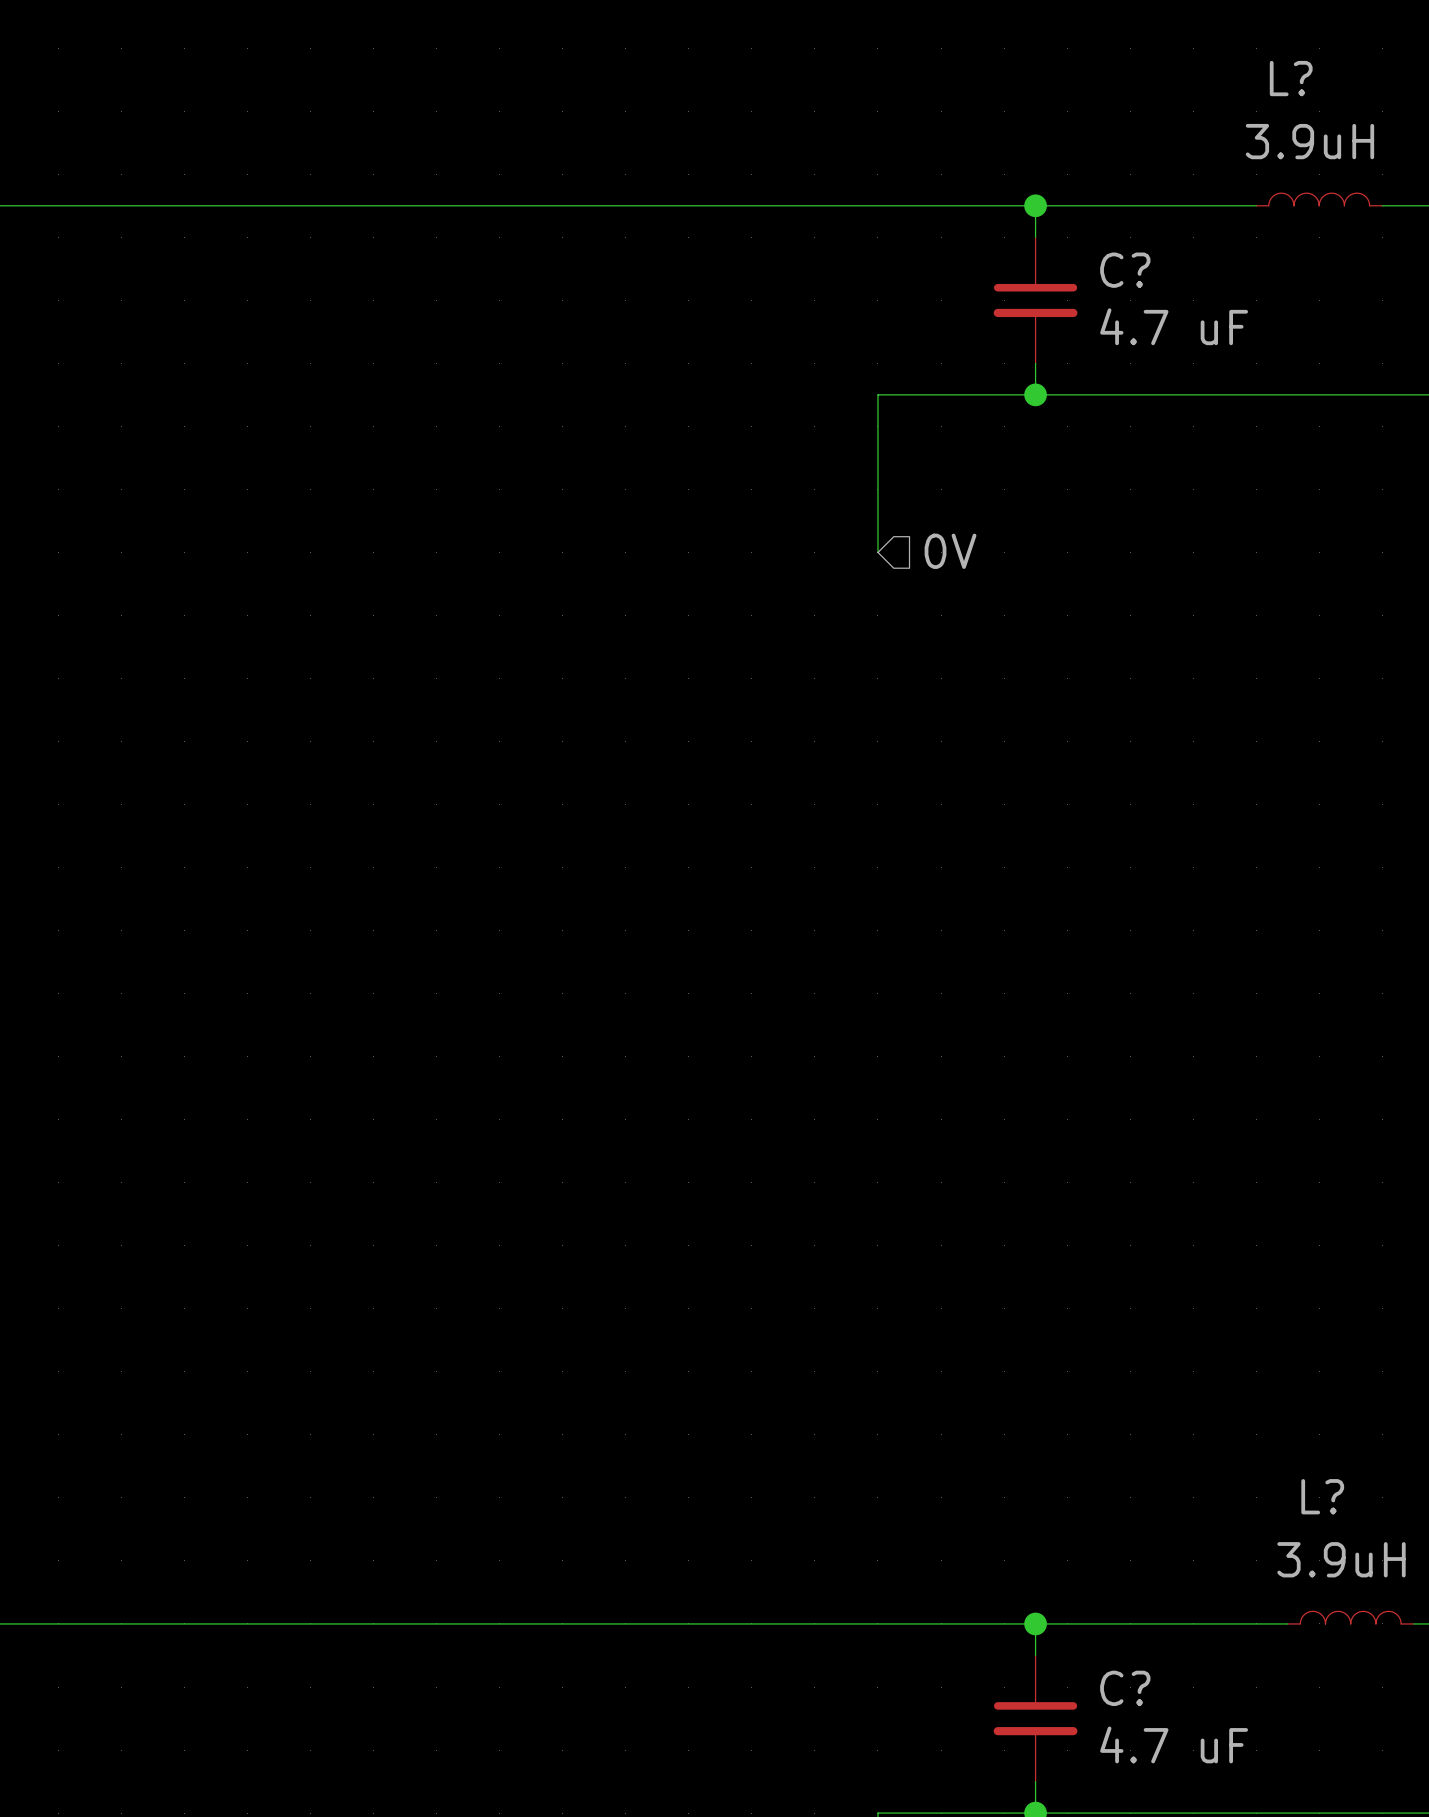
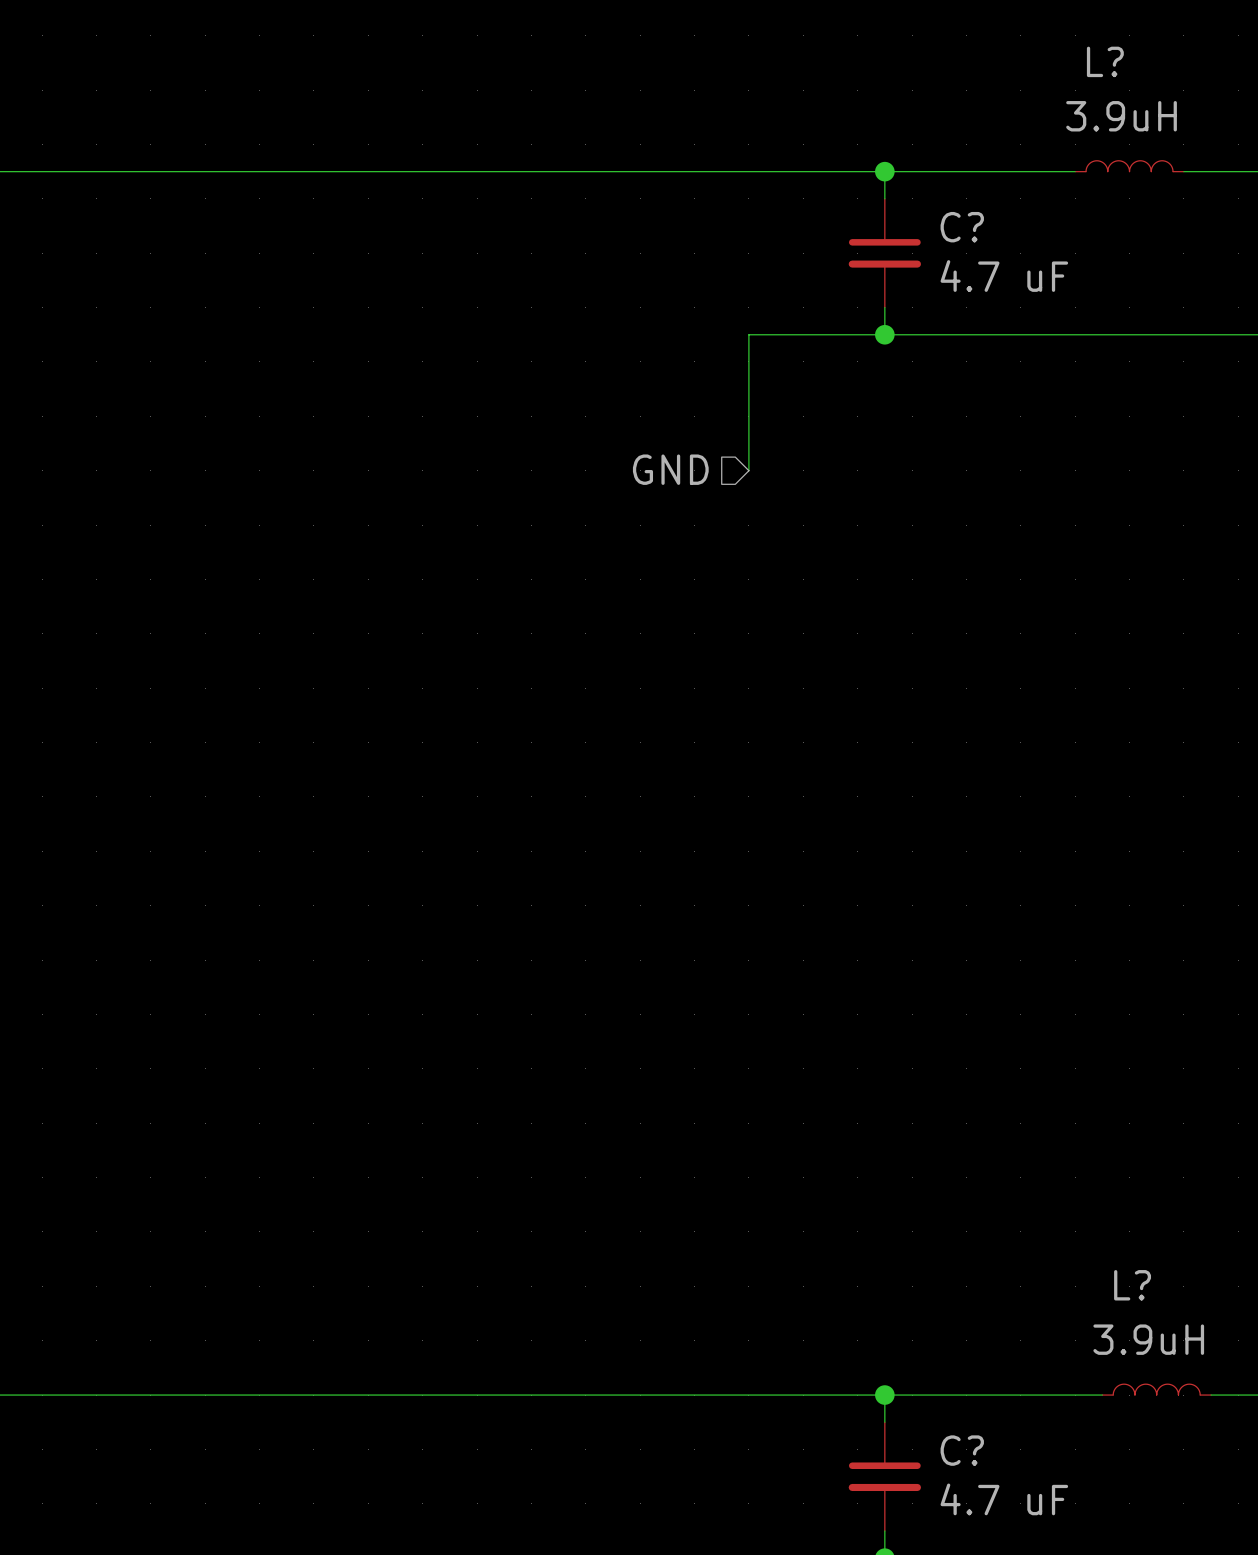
hierarchical label: none -> GND (670, 469)
hierarchical label: 0V (950, 551) -> none

